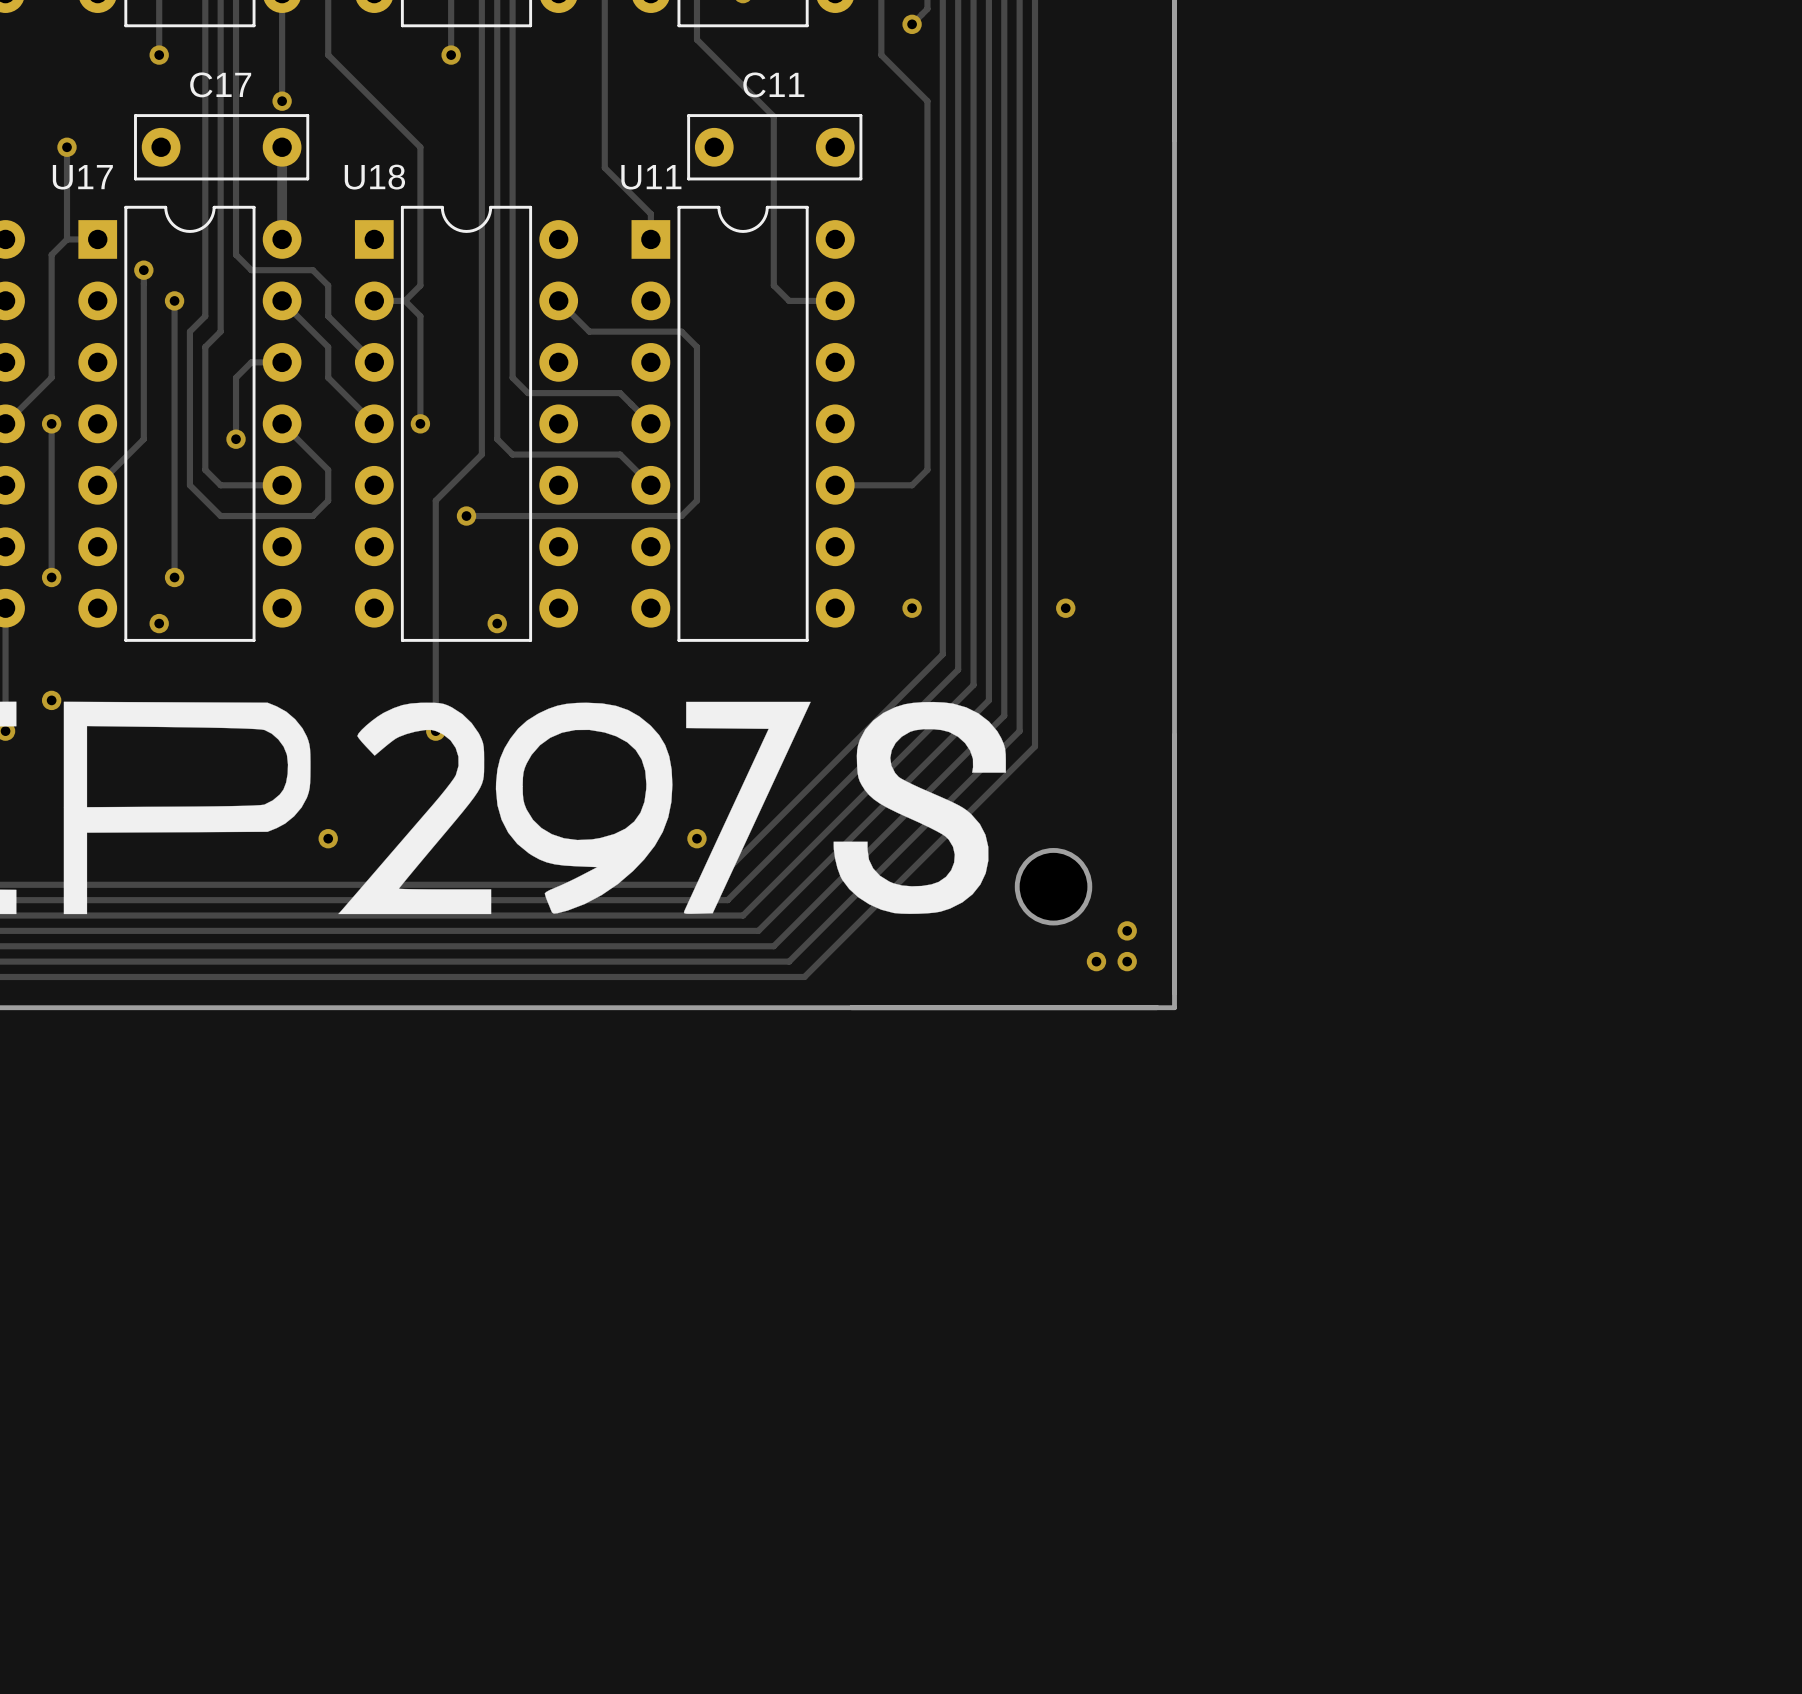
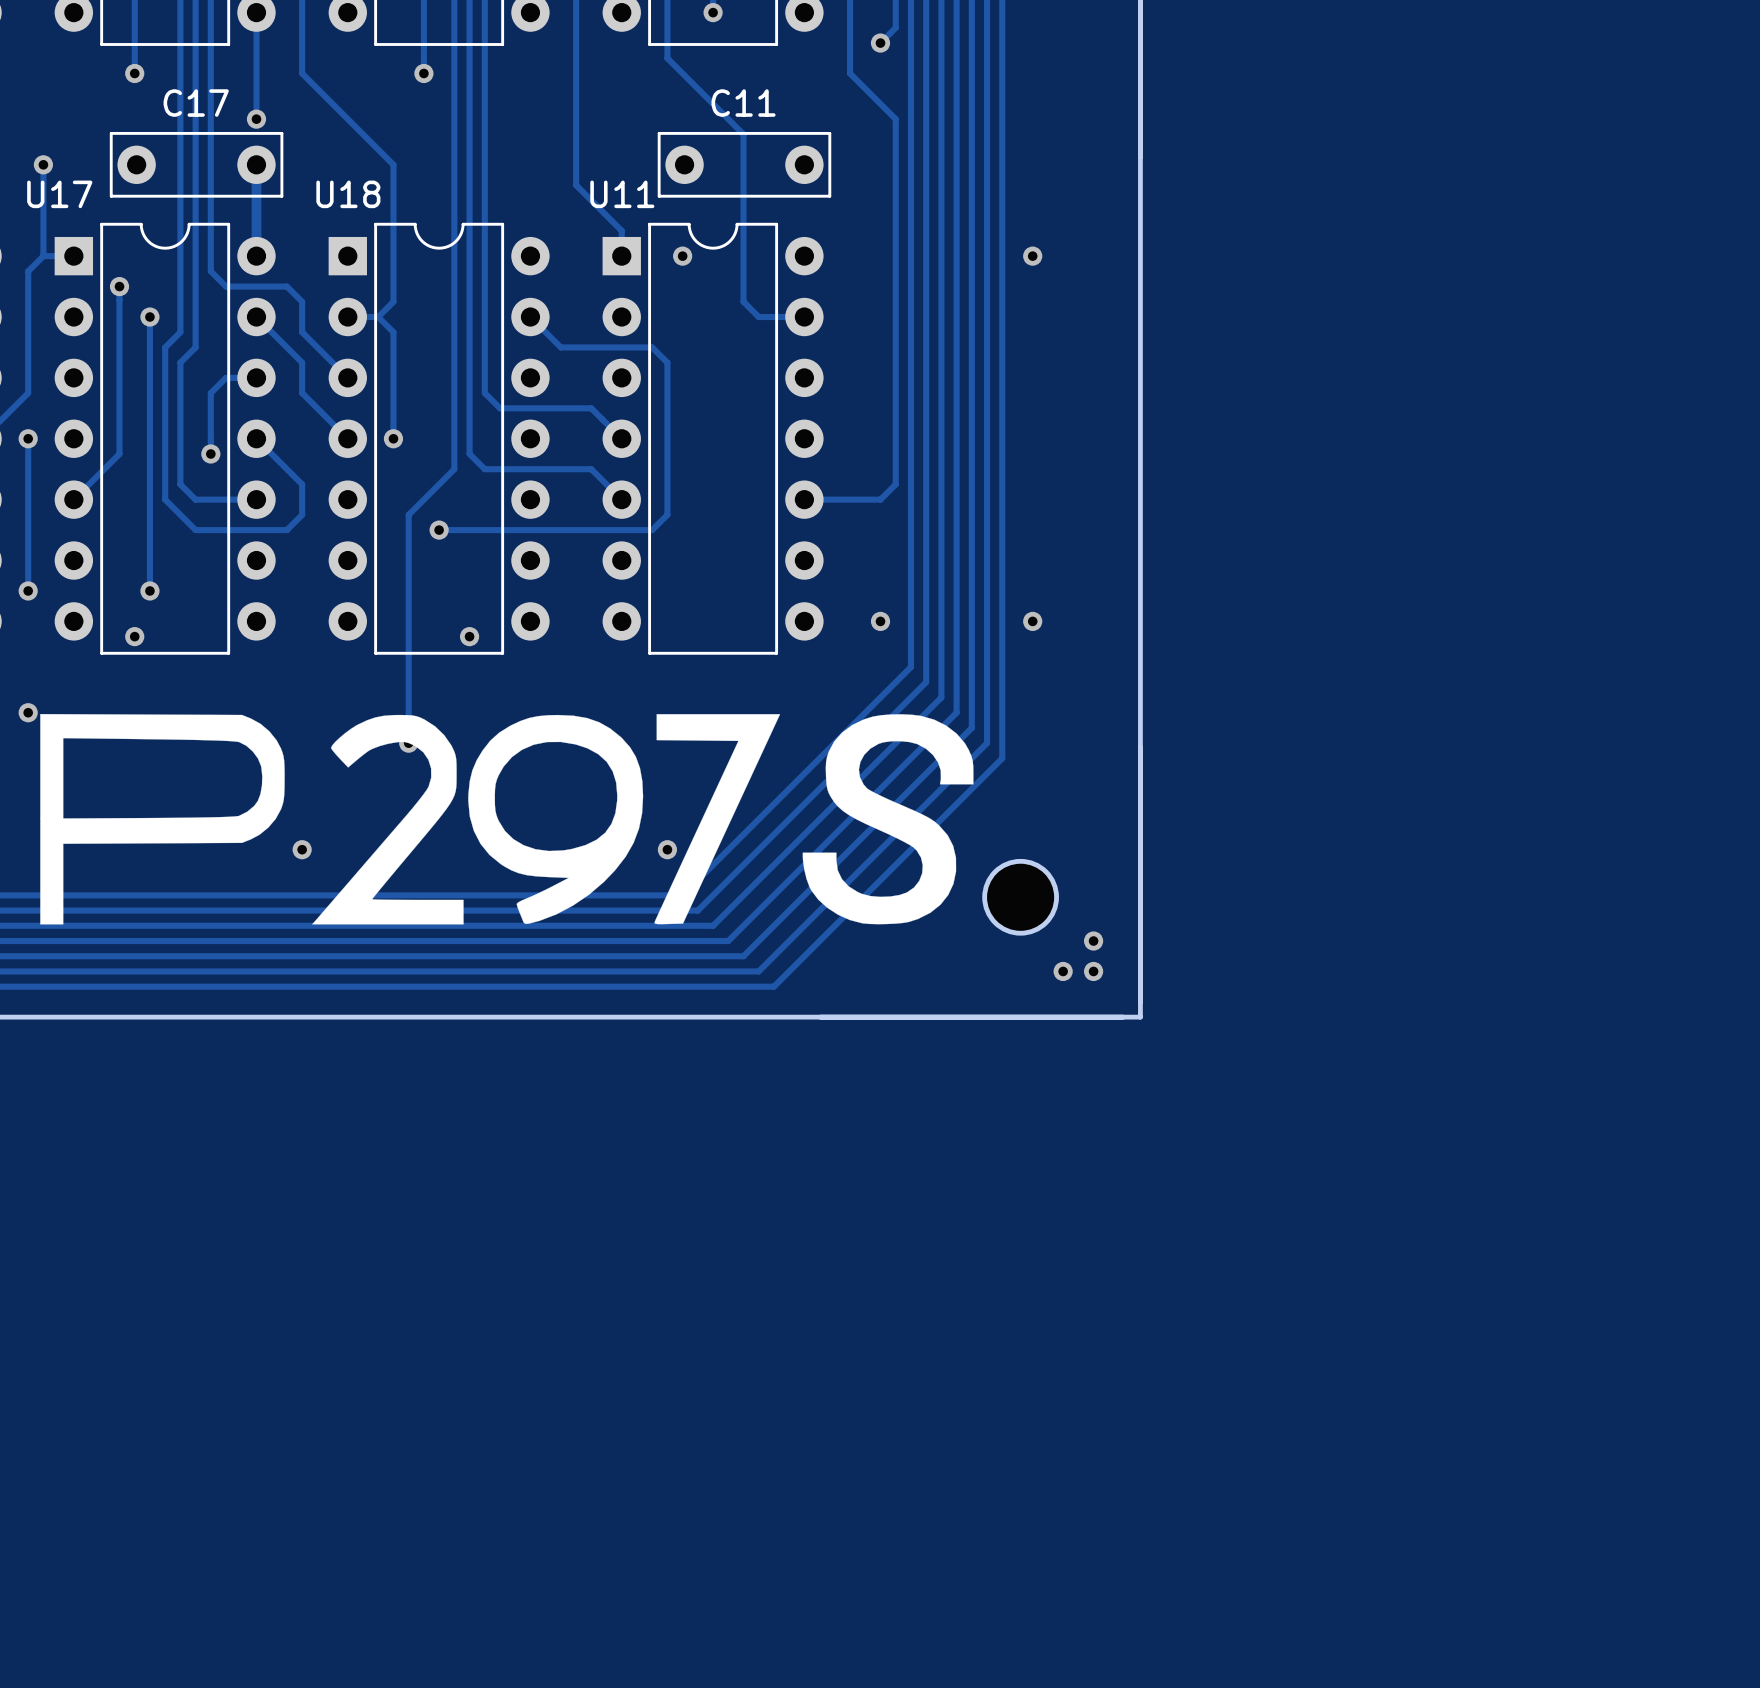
via: none -> (682, 256)
via: none -> (1032, 256)

